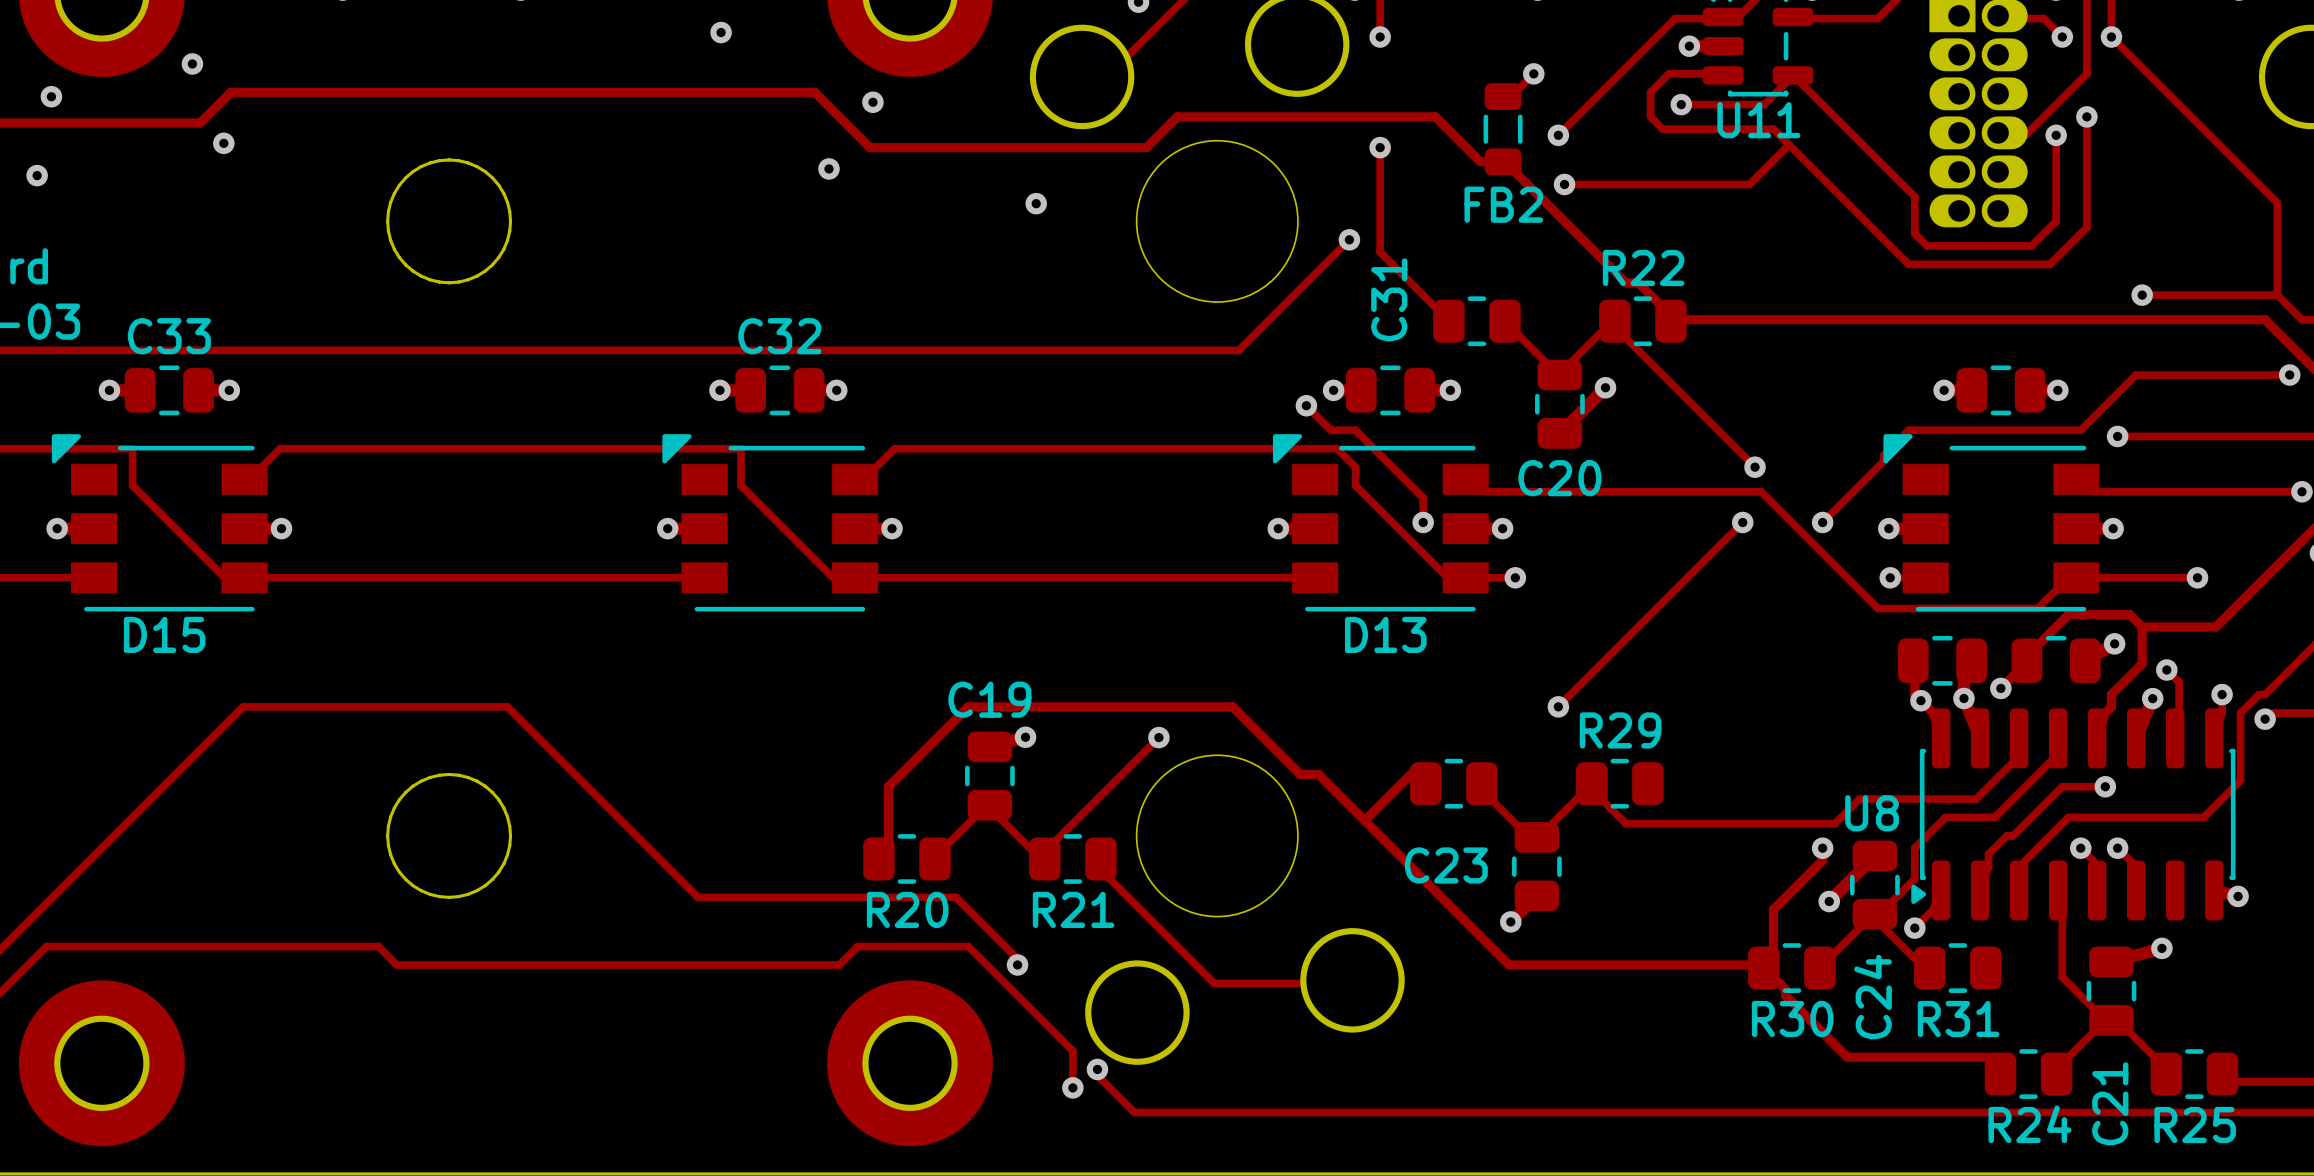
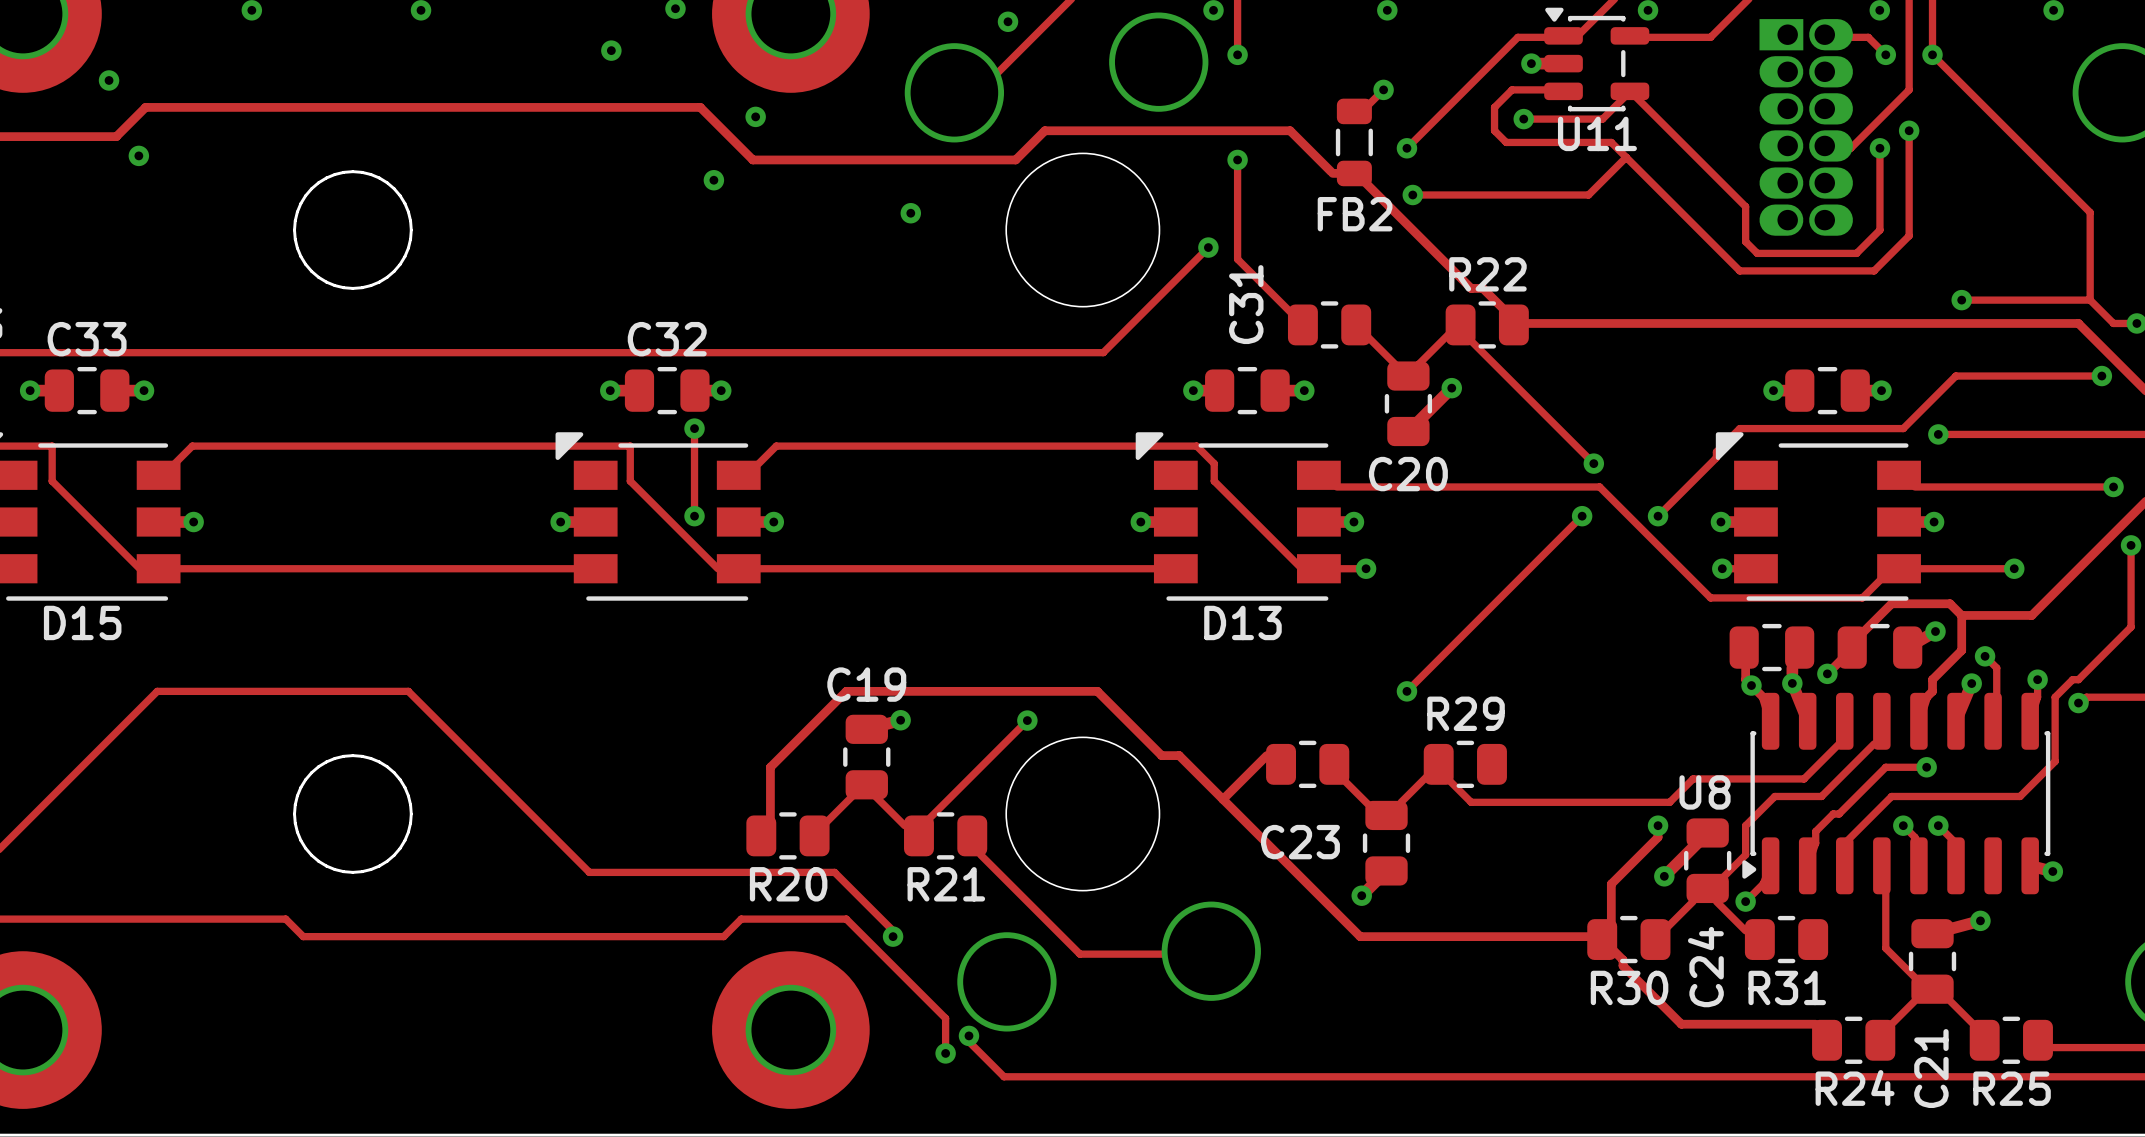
track: (1306, 405) (1330, 430) (1355, 430) (1423, 497) (1423, 522) -> none
via: (1306, 405) -> none
track: none -> (694, 428) (694, 516)
via: none -> (694, 428)
via: none -> (694, 516)
via: (1423, 522) -> none

